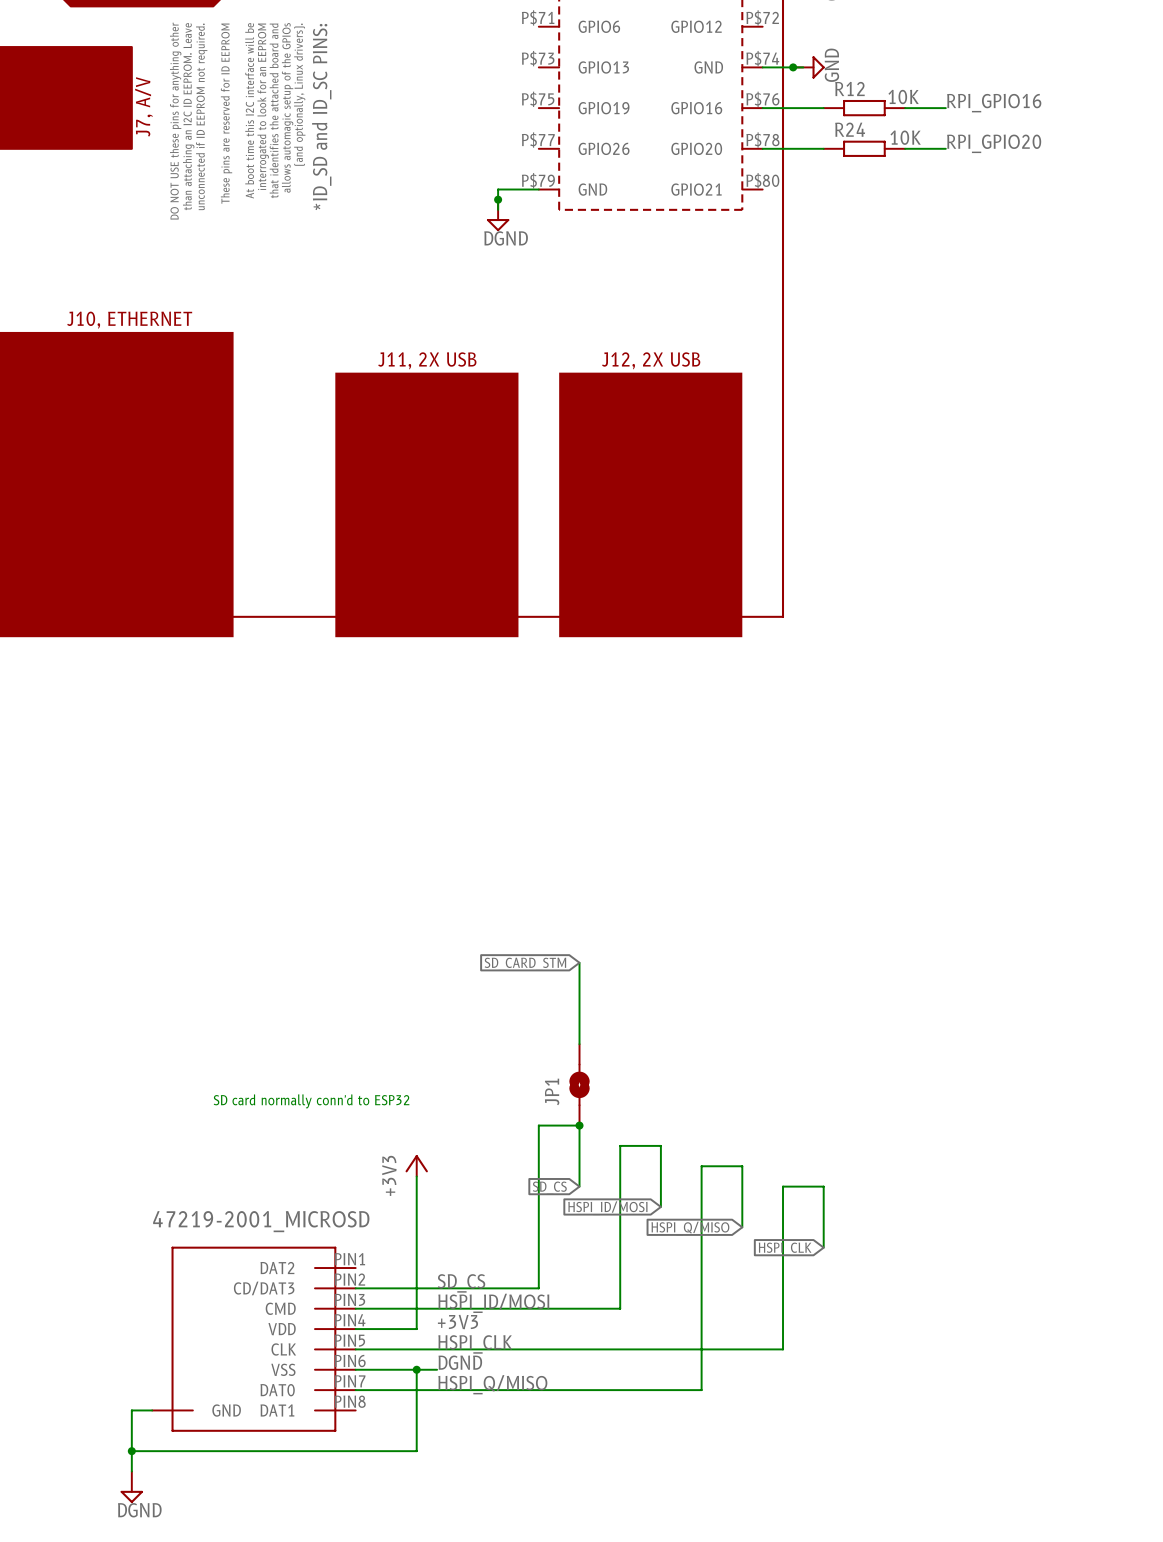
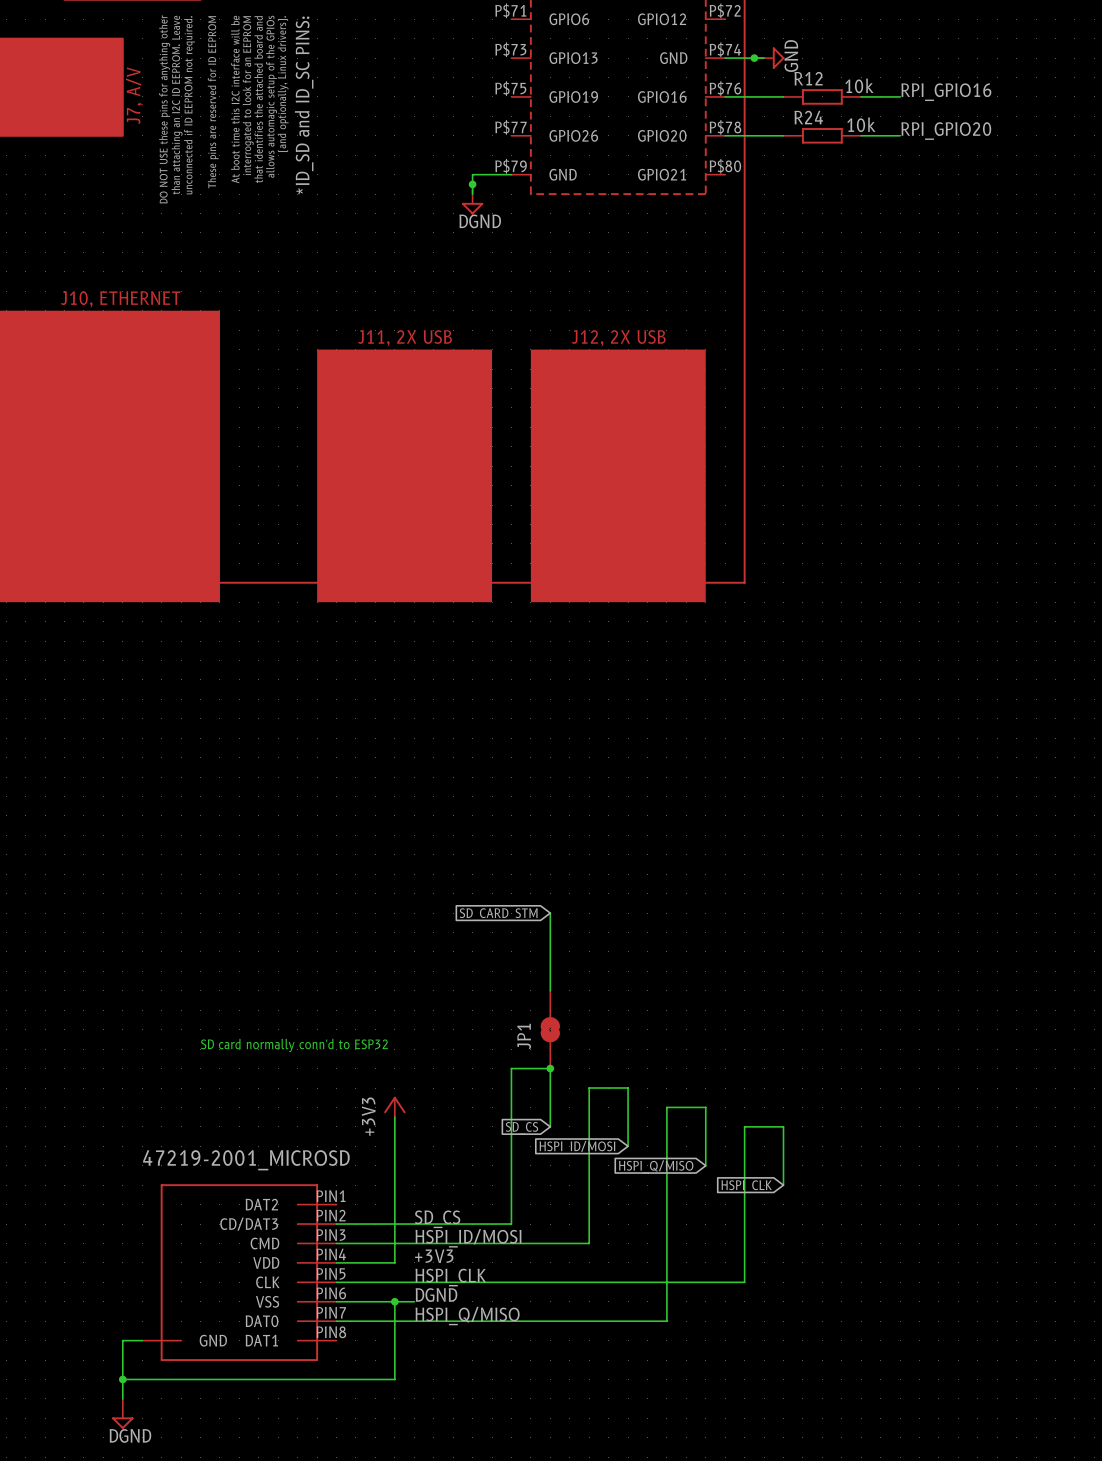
R12 value: 10K (903, 97) -> 10k (859, 85)
R24 value: 10K (905, 137) -> 10k (861, 124)

